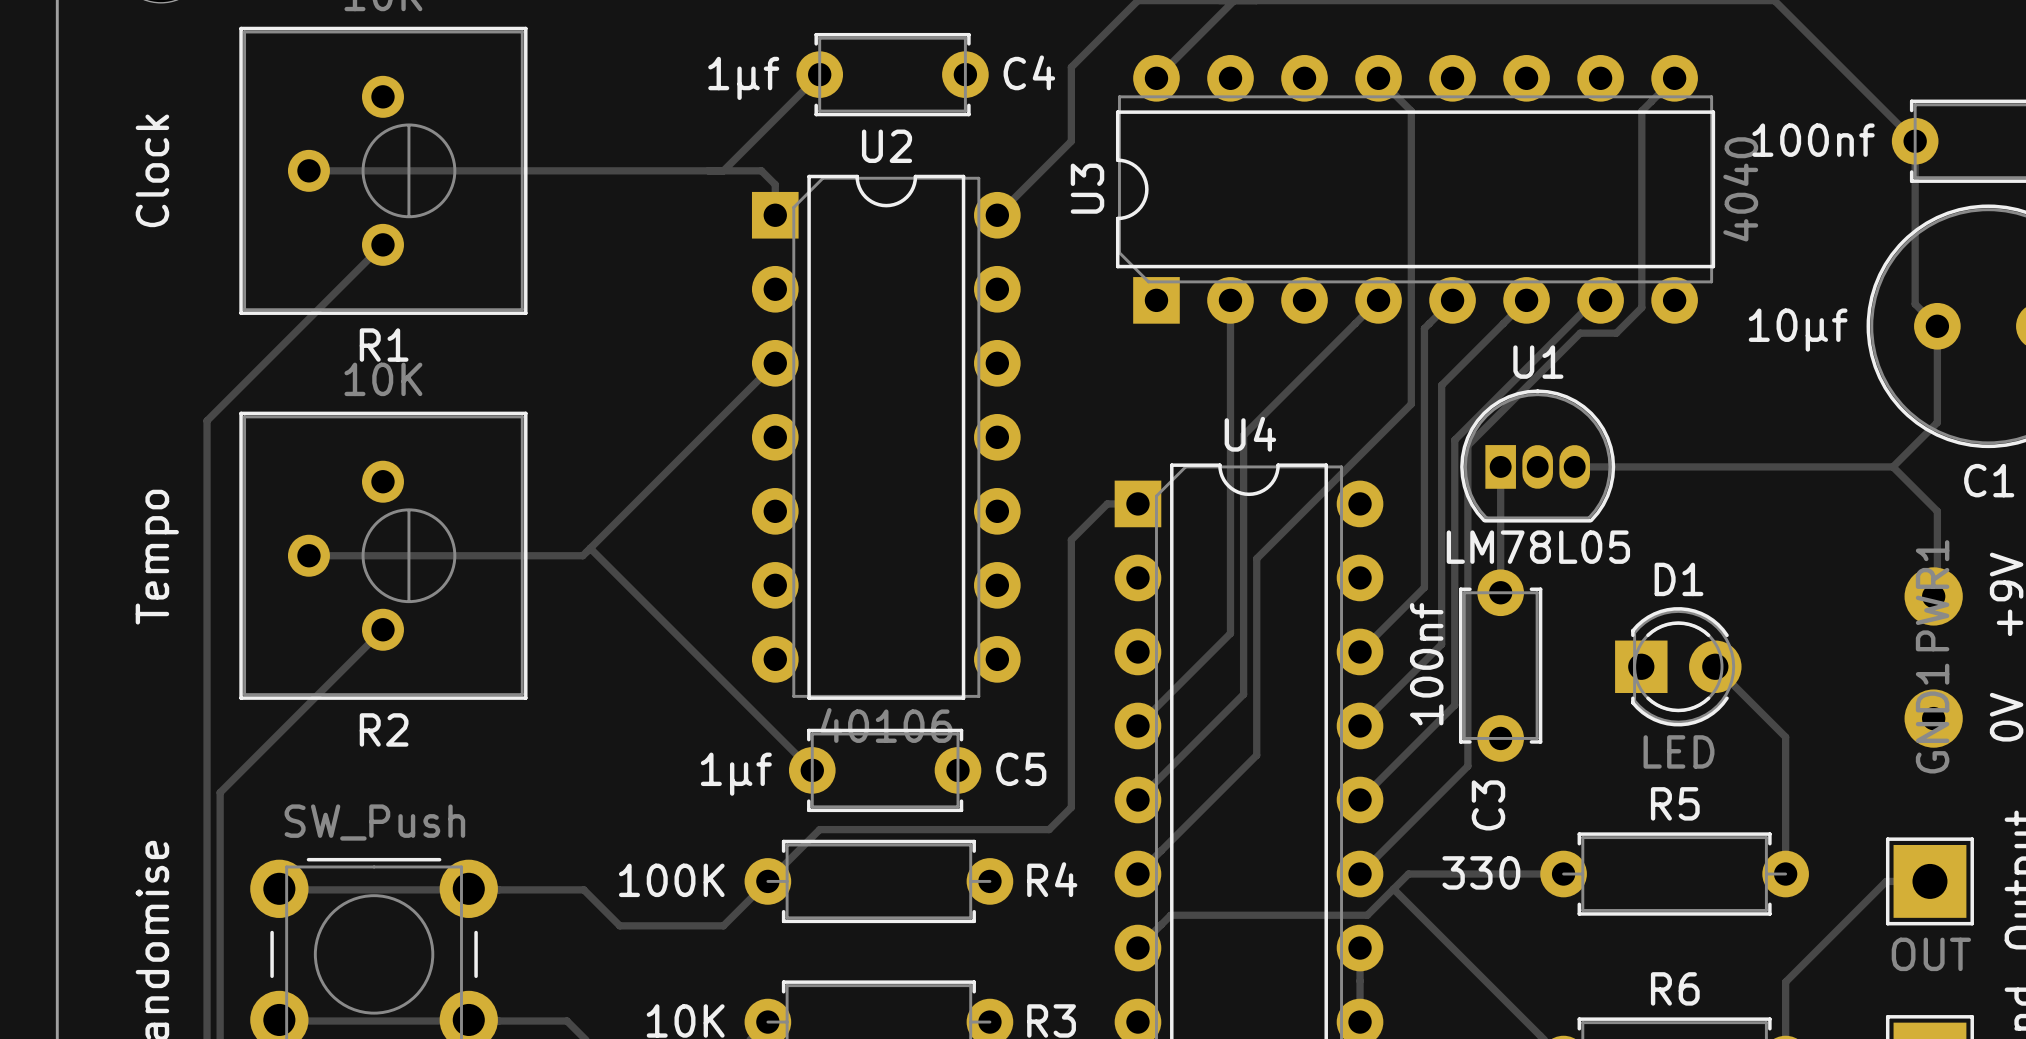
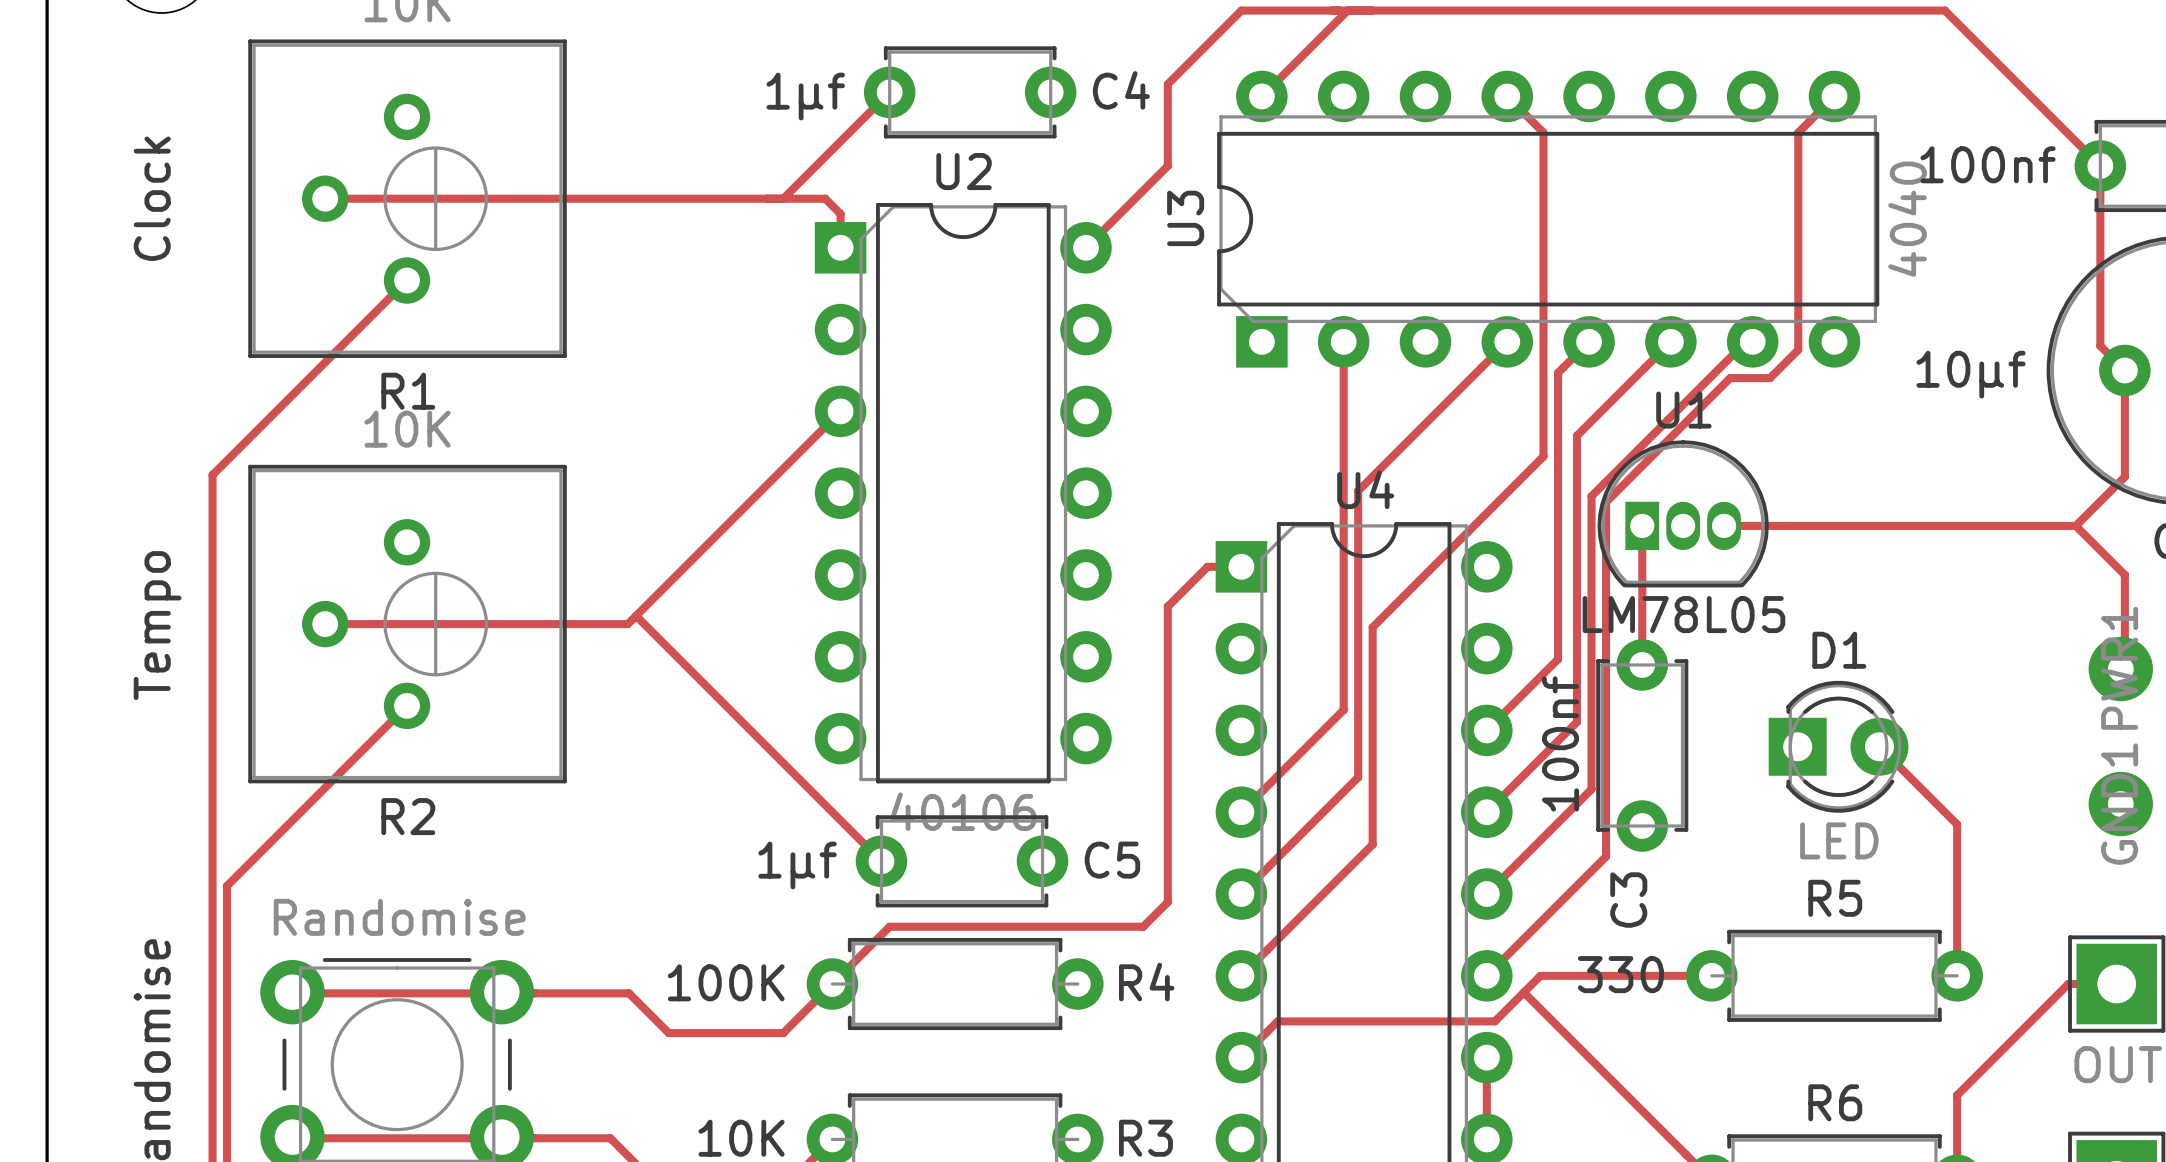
part value: SW_Push (374, 822) -> Randomise (399, 917)

